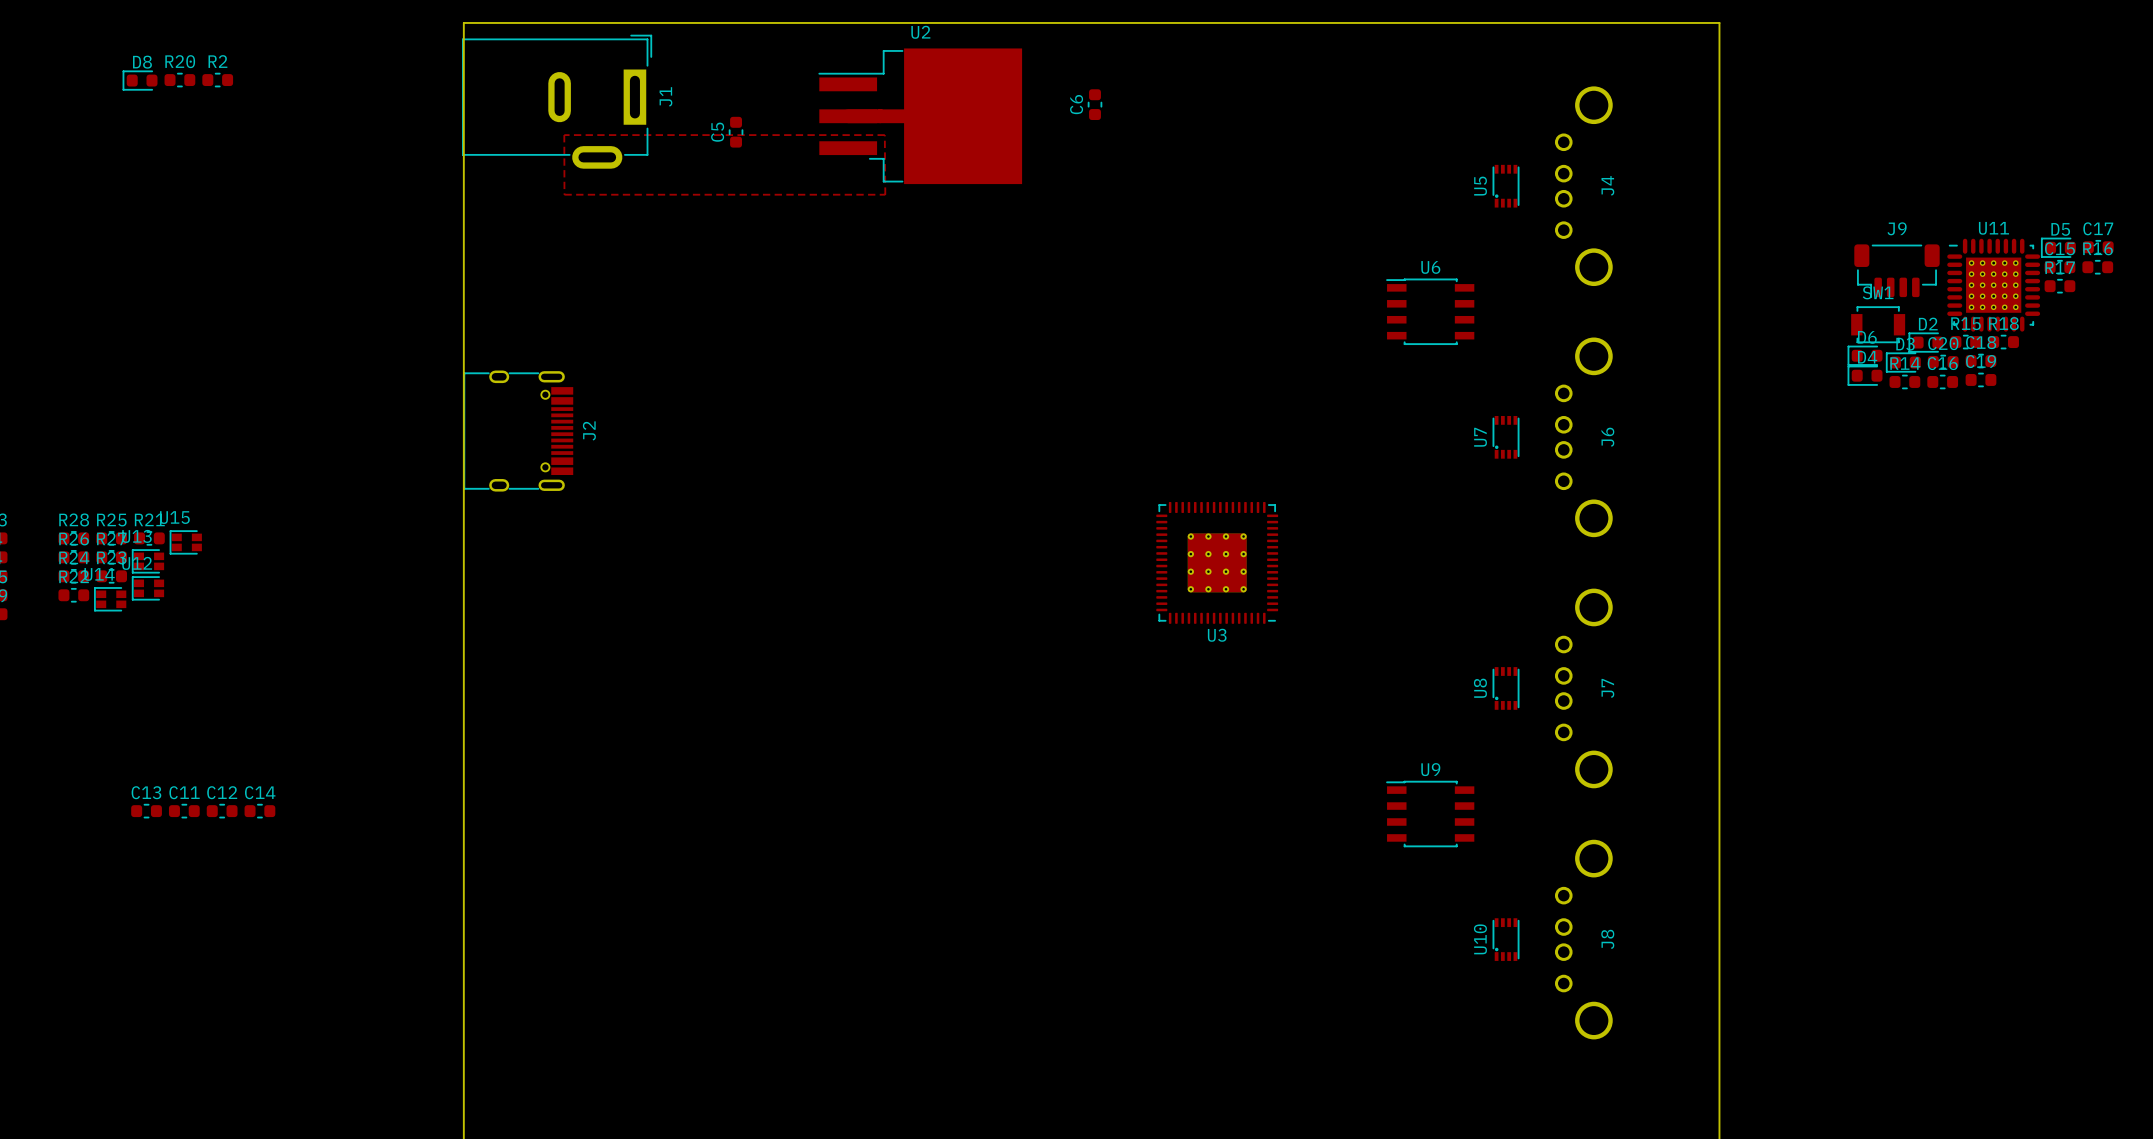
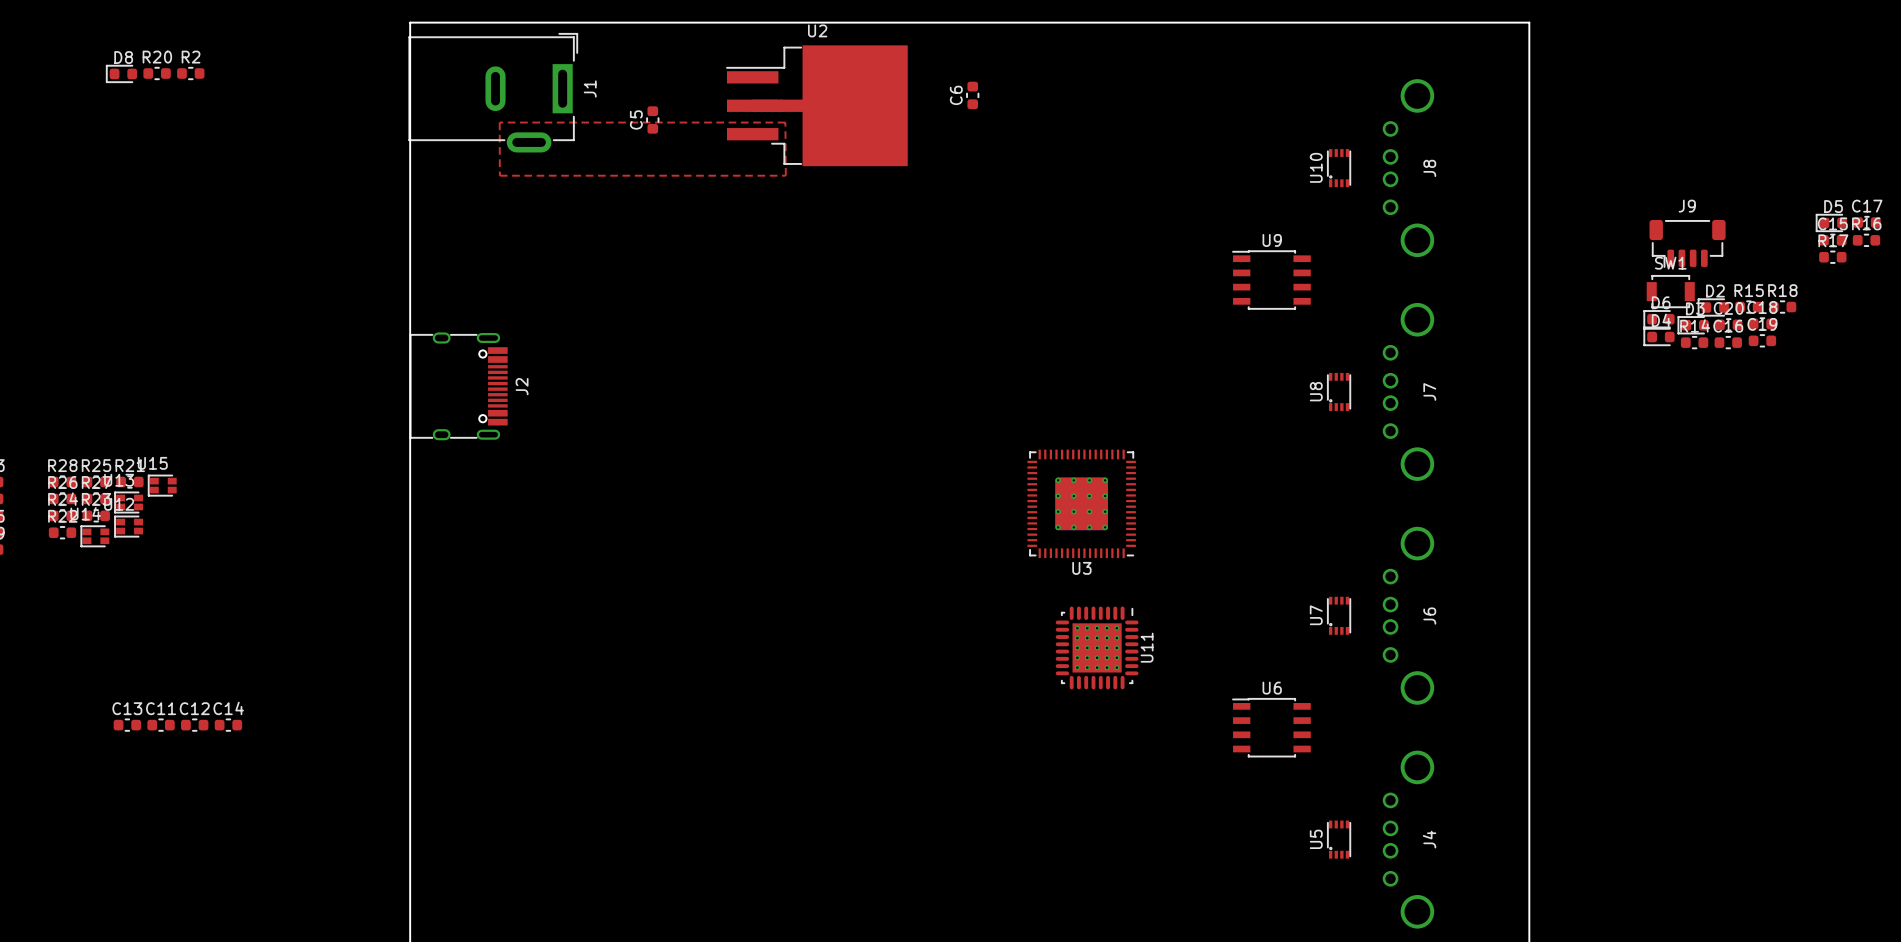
J4 name: J4 (1607, 185) -> J8 (1429, 168)
U5 name: U5 (1480, 186) -> U10 (1316, 167)
U6 name: U6 (1430, 267) -> U9 (1272, 240)
U11 rotation: 0° (1993, 285) -> 90° clockwise (1097, 647)
U11 position: (1993, 285) -> (1097, 647)
U7 name: U7 (1480, 437) -> U8 (1316, 391)
J6 name: J6 (1607, 437) -> J7 (1429, 391)
U8 name: U8 (1480, 688) -> U7 (1316, 615)
J7 name: J7 (1607, 688) -> J6 (1429, 616)
U9 name: U9 (1430, 769) -> U6 (1272, 688)
U10 name: U10 (1480, 939) -> U5 (1316, 839)
J8 name: J8 (1607, 939) -> J4 (1429, 839)

